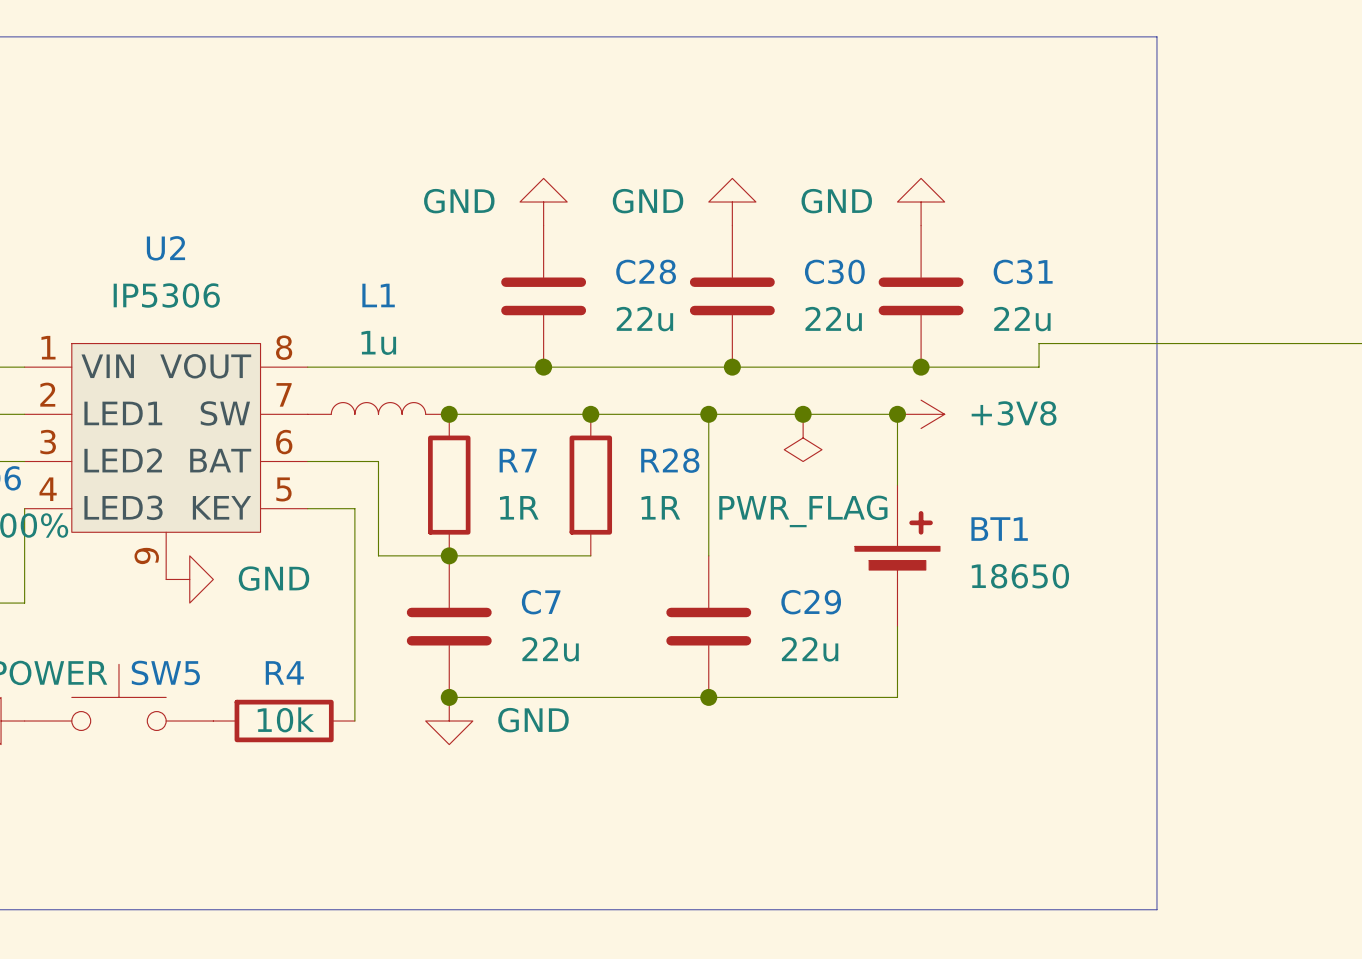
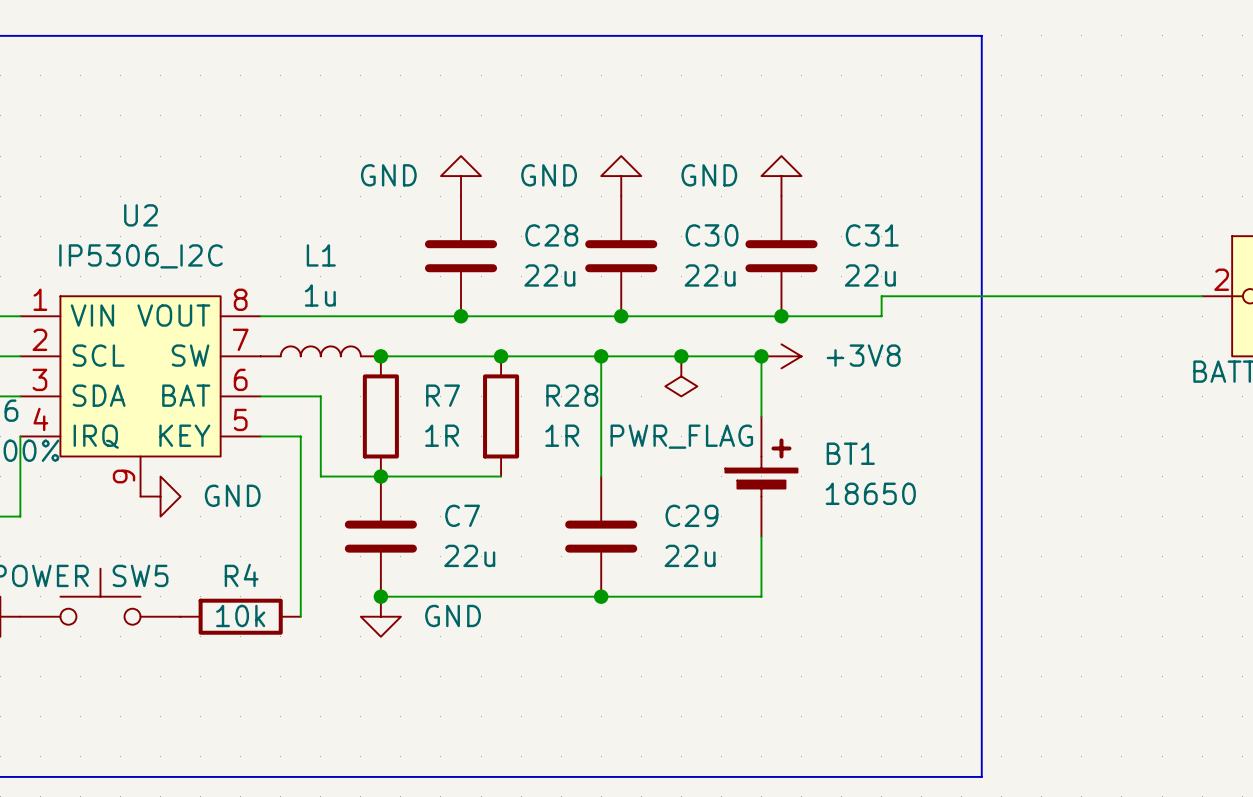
U2 value: IP5306 (166, 295) -> IP5306_I2C (141, 256)
U2 pin name: LED1 (123, 413) -> SCL (98, 355)
U2 pin name: LED2 (123, 460) -> SDA (99, 395)
U2 pin name: LED3 (123, 507) -> IRQ (96, 436)

